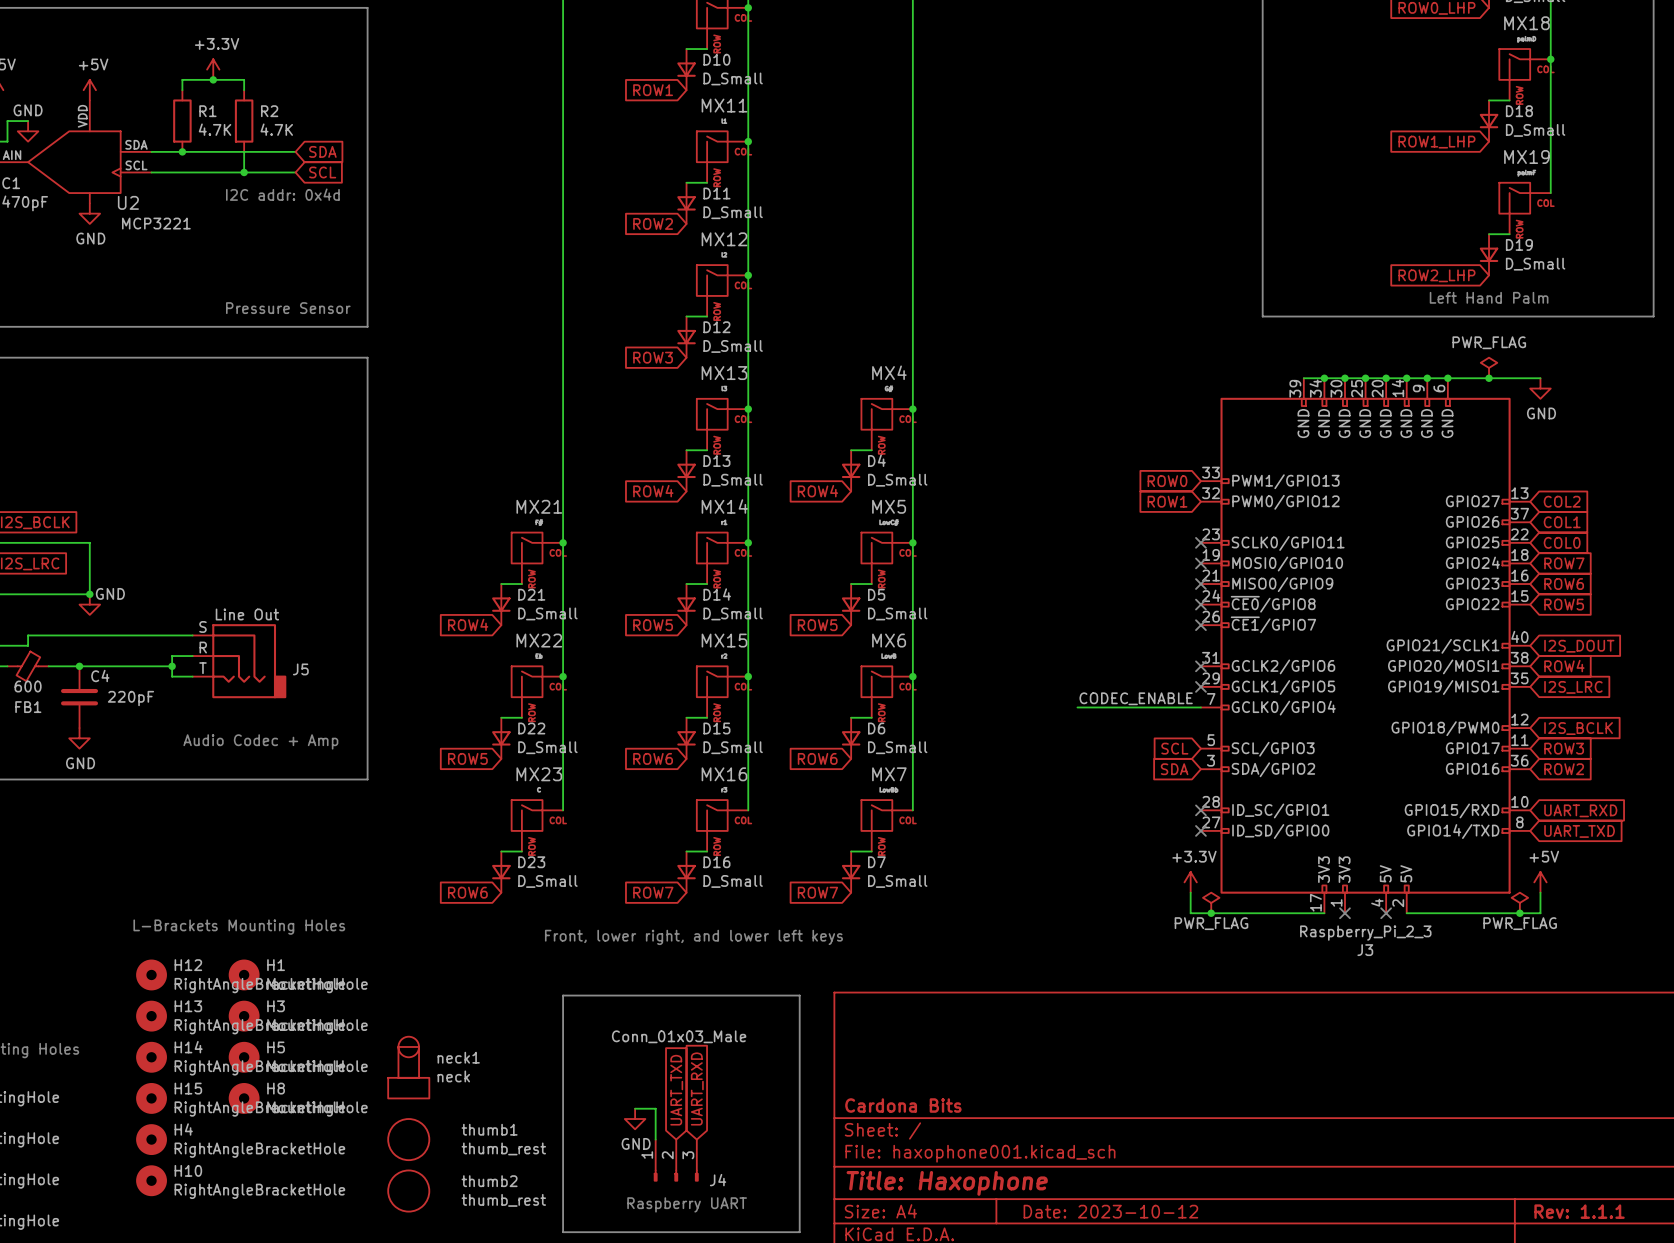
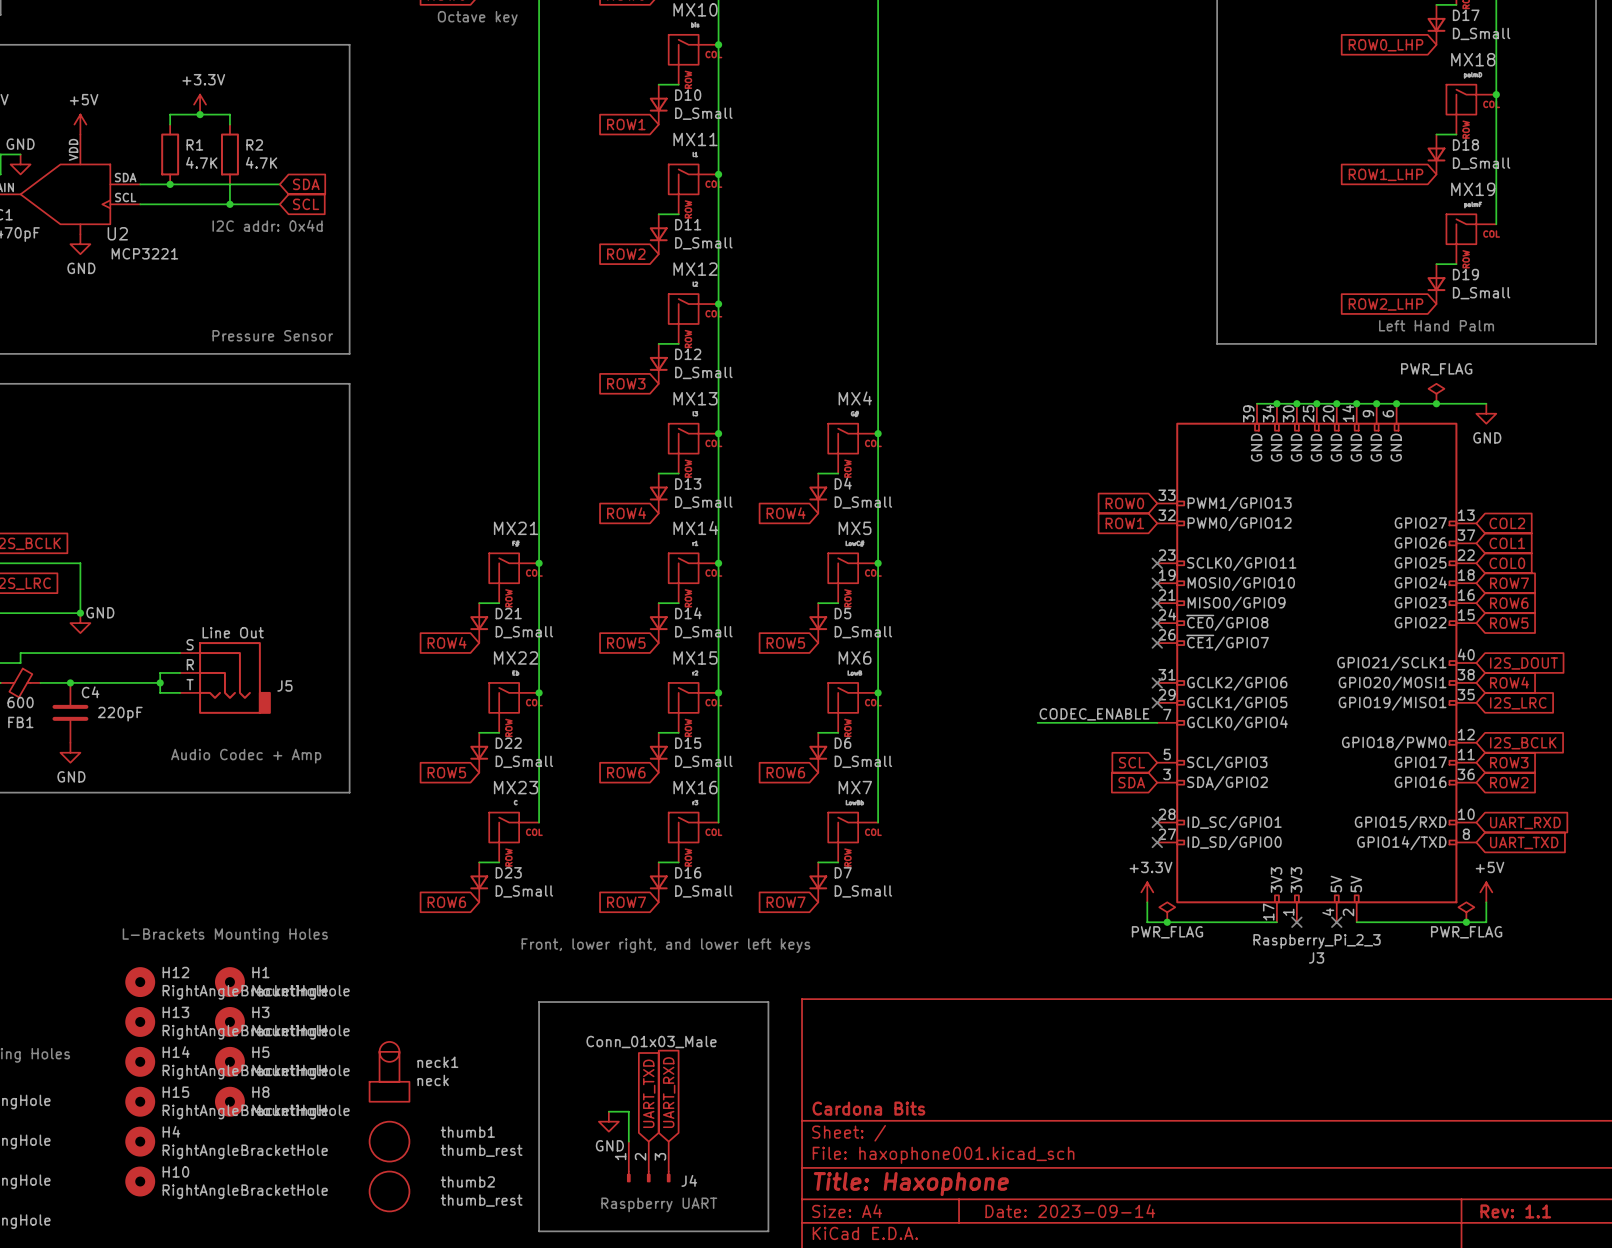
title block: Date: 2023-10-12 (1110, 1211) -> Date: 2023-09-14 (1070, 1211)
title block: Rev: 1.1.1 (1579, 1211) -> Rev: 1.1 (1515, 1211)

